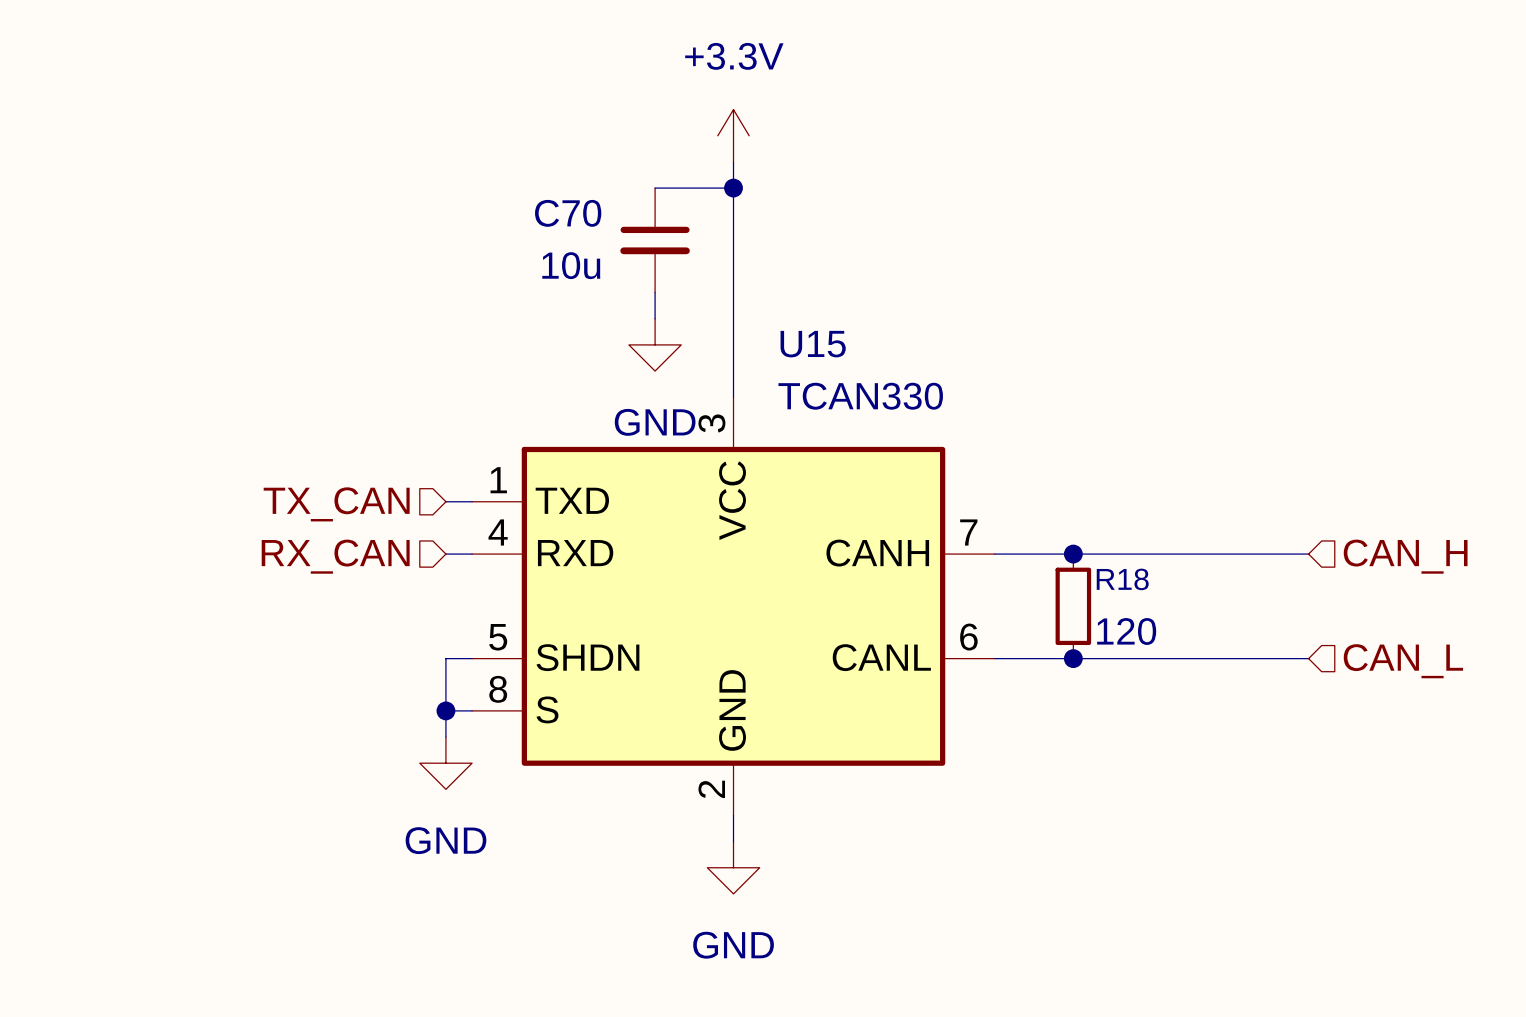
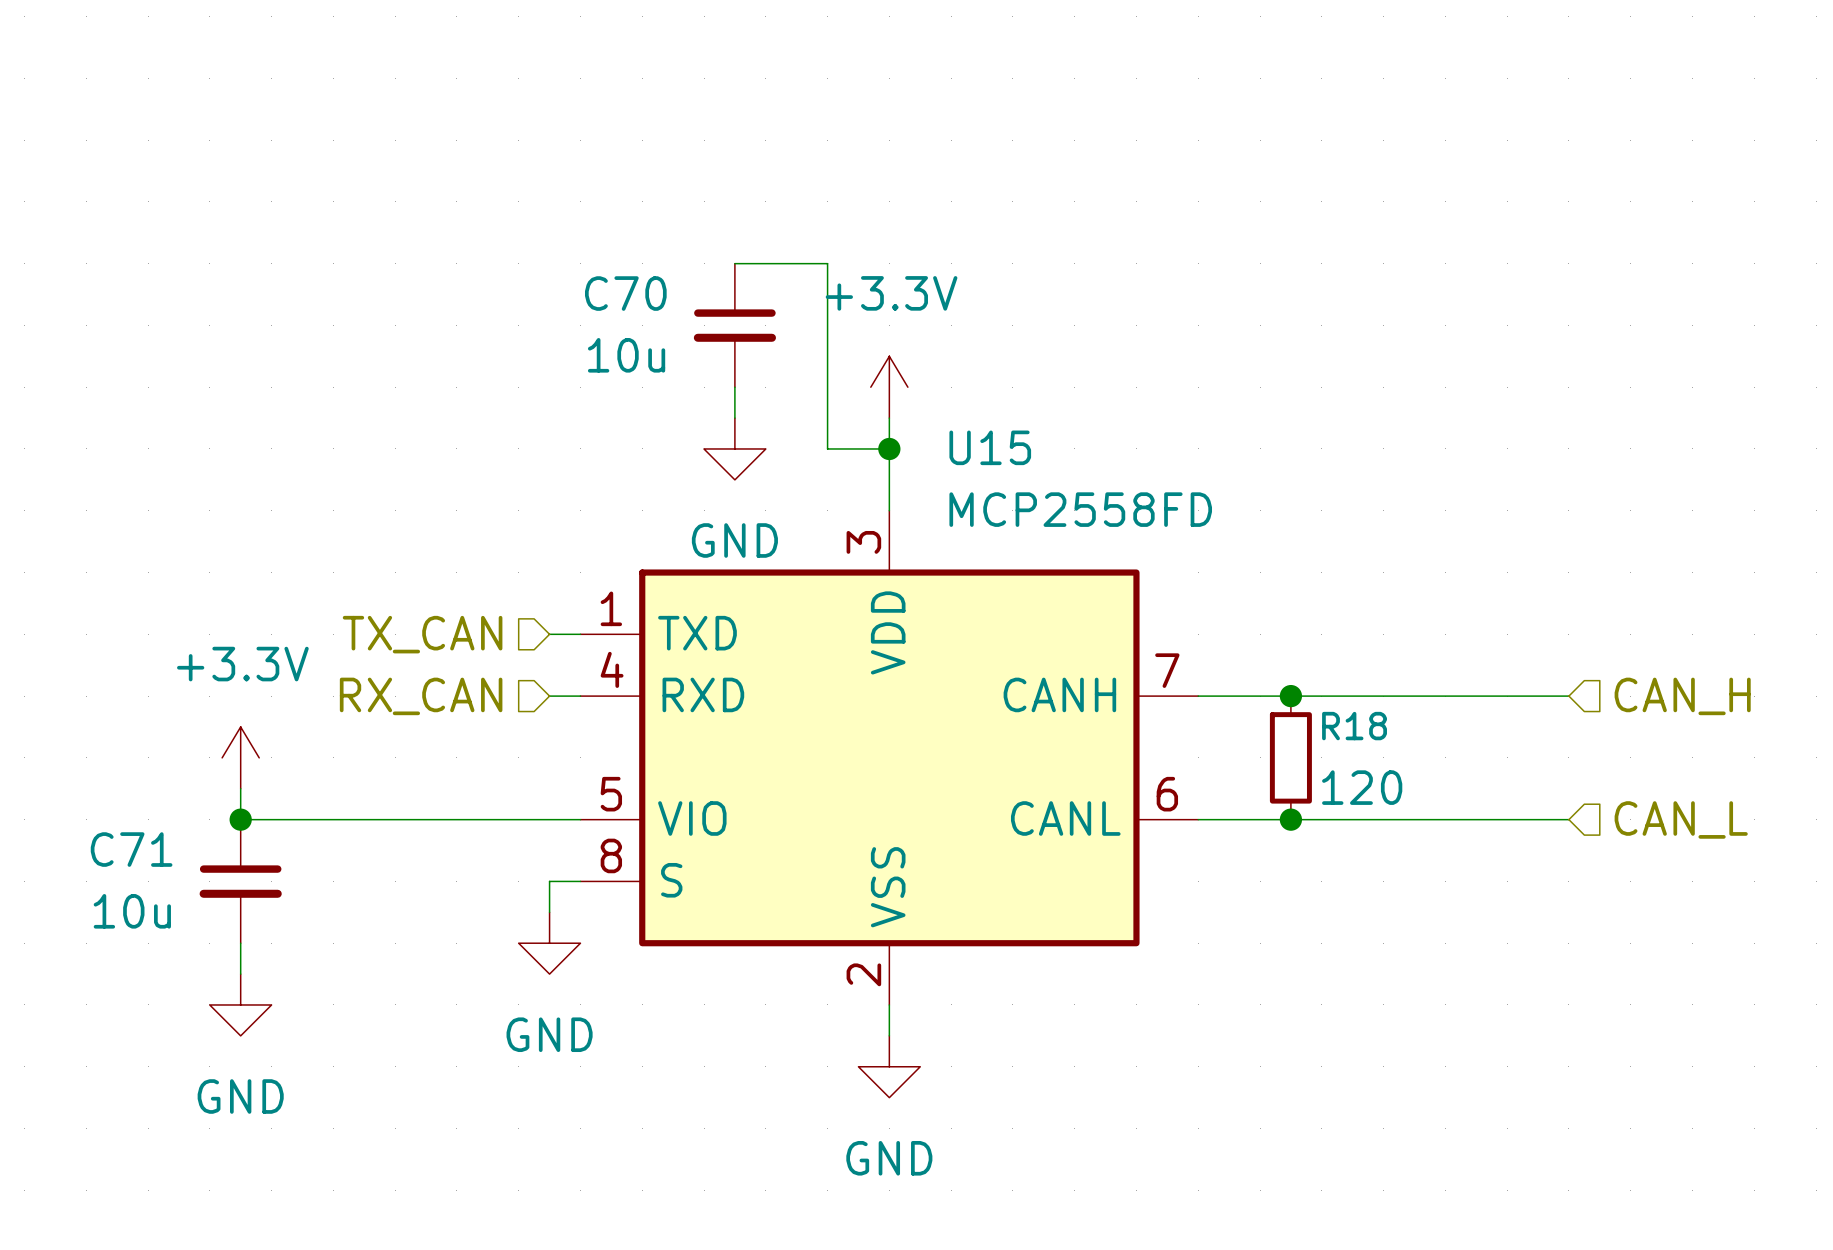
power symbol position: +3.3V (733, 135) -> +3.3V (889, 387)
wire: (733, 161) (733, 318) -> none
wire: none -> (734, 263) (796, 263)
wire: (681, 188) (733, 188) -> (827, 263) (827, 448) (889, 448)
junction: (733, 188) -> none
C70 position: (655, 240) -> (734, 325)
wire: (655, 292) (655, 318) -> (734, 387) (734, 418)
power symbol position: GND (655, 344) -> GND (734, 448)
junction: none -> (889, 448)
U15 value: TCAN330 (860, 396) -> MCP2558FD (1080, 509)
U15 pin name: VCC (732, 500) -> VDD (888, 632)
power symbol: none -> +3.3V (240, 757)
U15 pin name: SHDN (587, 657) -> VIO (692, 818)
junction: none -> (240, 819)
wire: (445, 658) (445, 710) -> (549, 819) (240, 819) (240, 788)
C71: none -> 10u (240, 881)
junction: (445, 710) -> none
U15 pin name: GND (732, 710) -> VSS (888, 887)
wire: none -> (240, 943) (240, 974)
power symbol: none -> GND (240, 1004)

